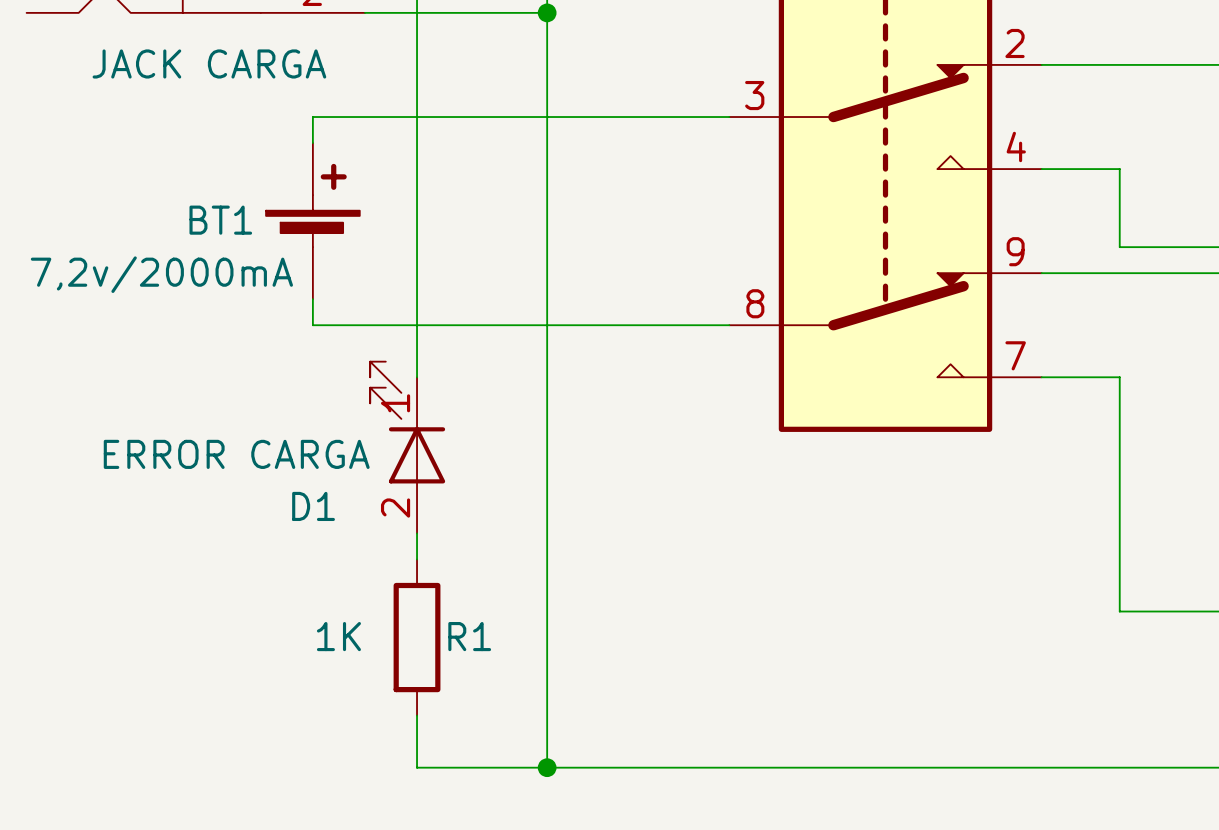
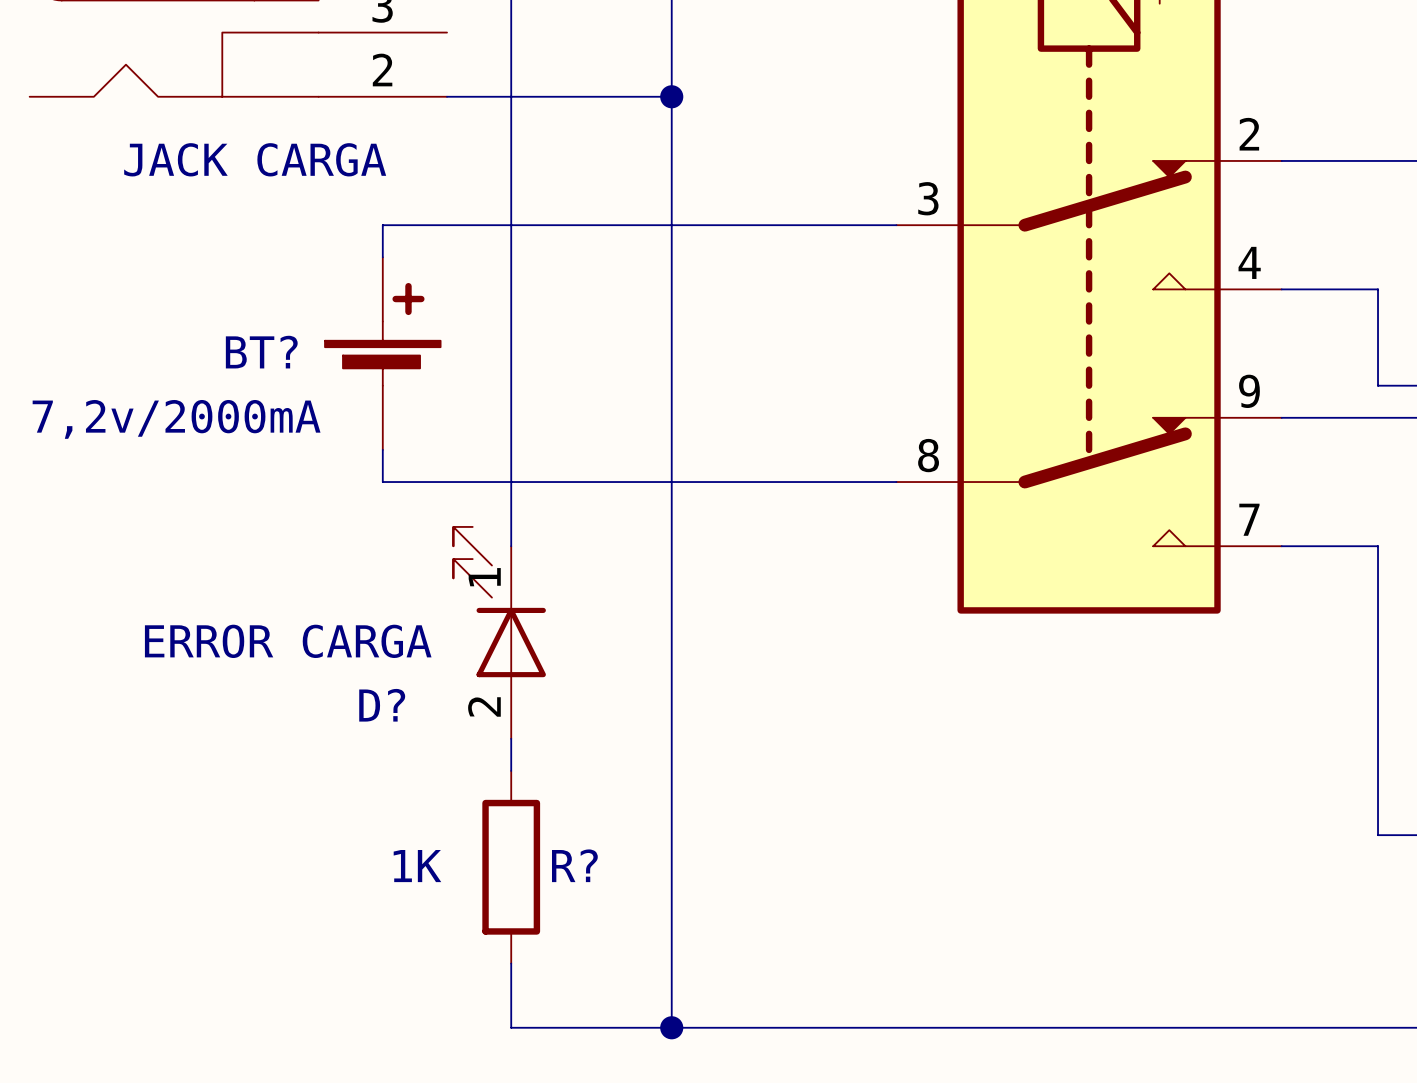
BT1 name: BT1 (220, 220) -> BT? (261, 352)
D1 name: D1 (313, 506) -> D? (382, 705)
R1 name: R1 (469, 636) -> R? (574, 865)

